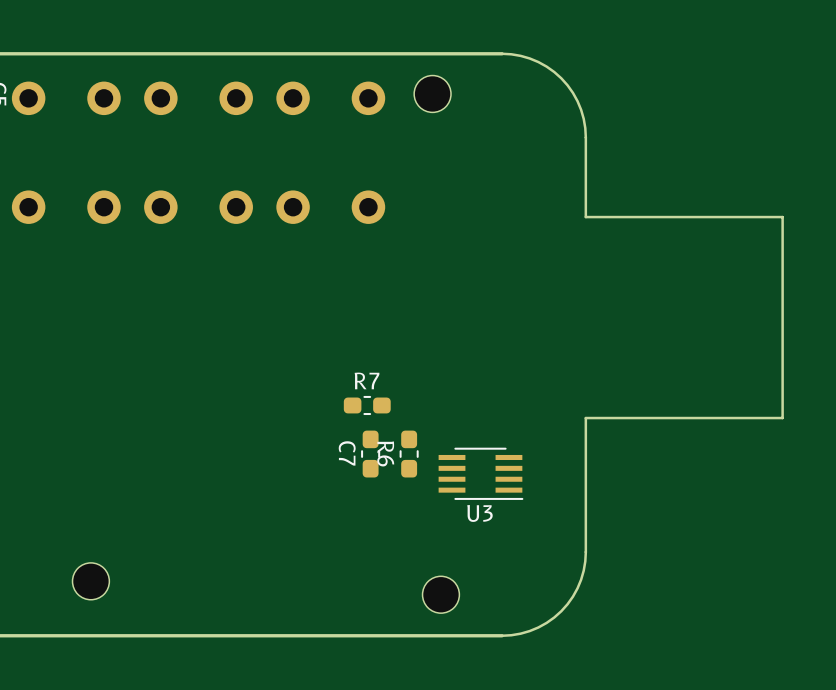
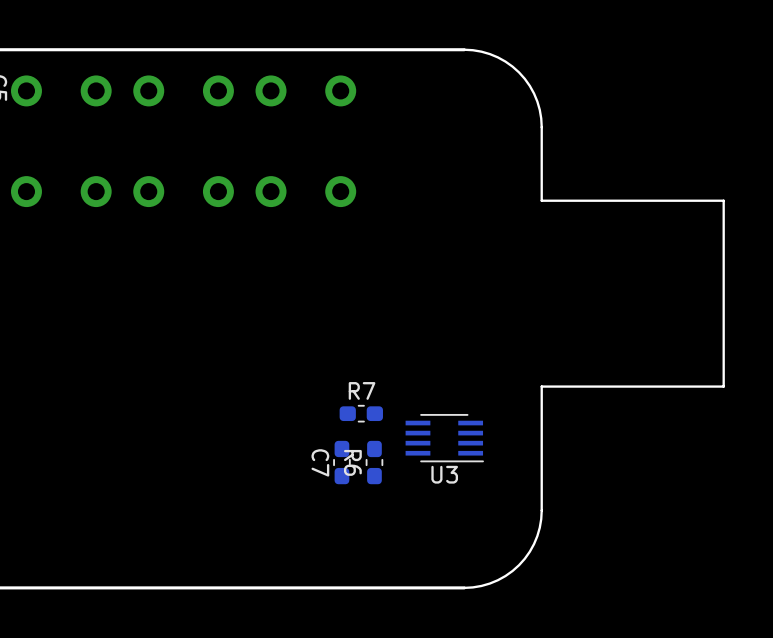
part: (432, 93) -> none
R7 position: (367, 405) -> (361, 413)
C7 position: (370, 454) -> (341, 462)
R6 position: (409, 454) -> (374, 462)
part: (90, 581) -> none
part: (440, 594) -> none

